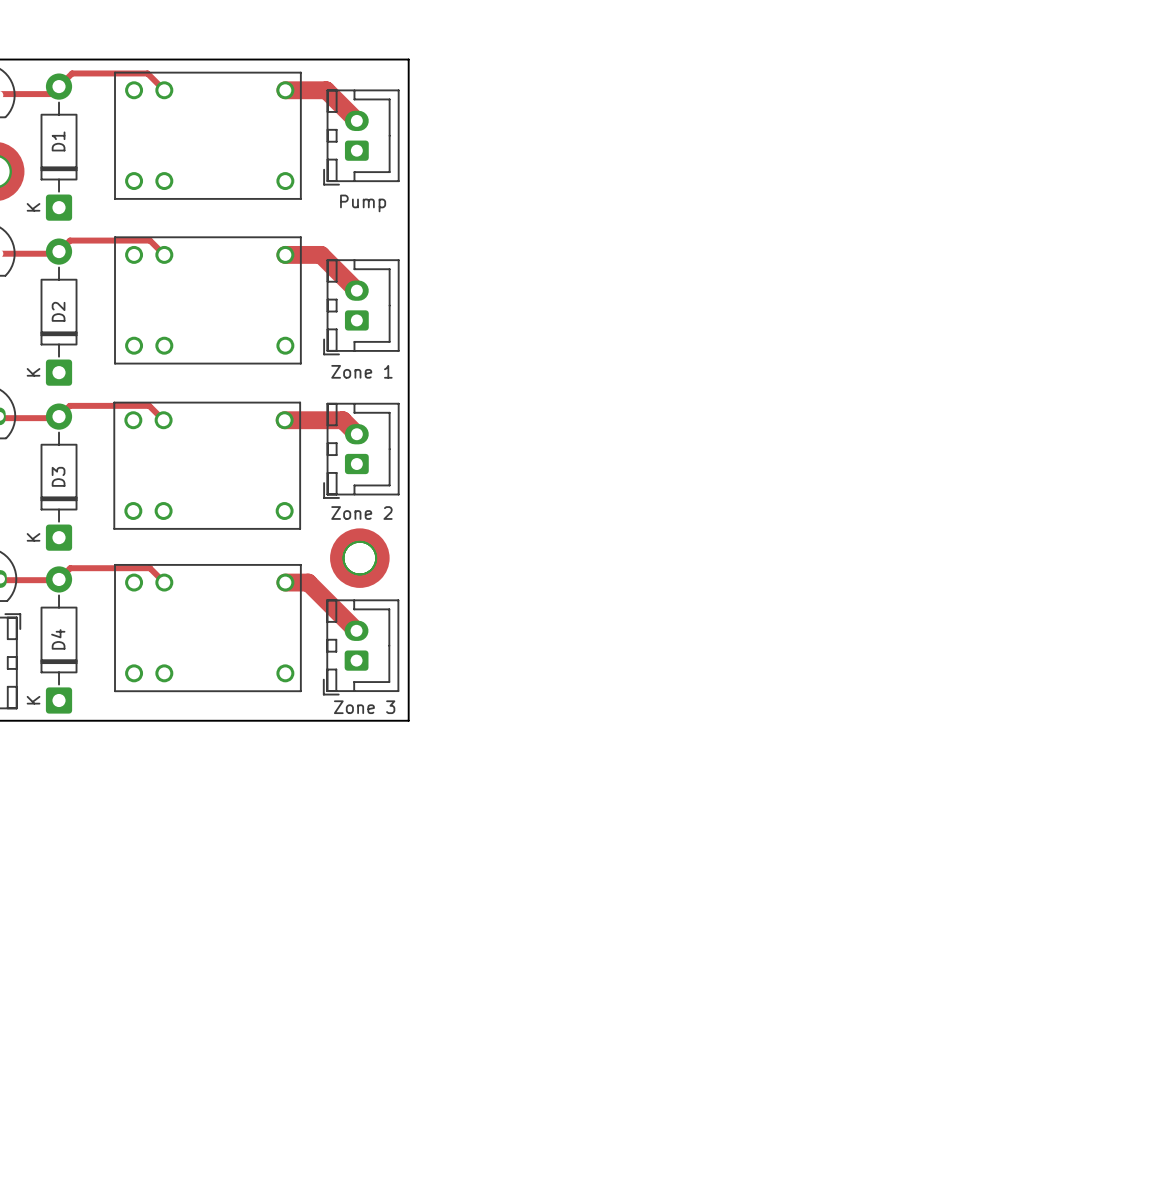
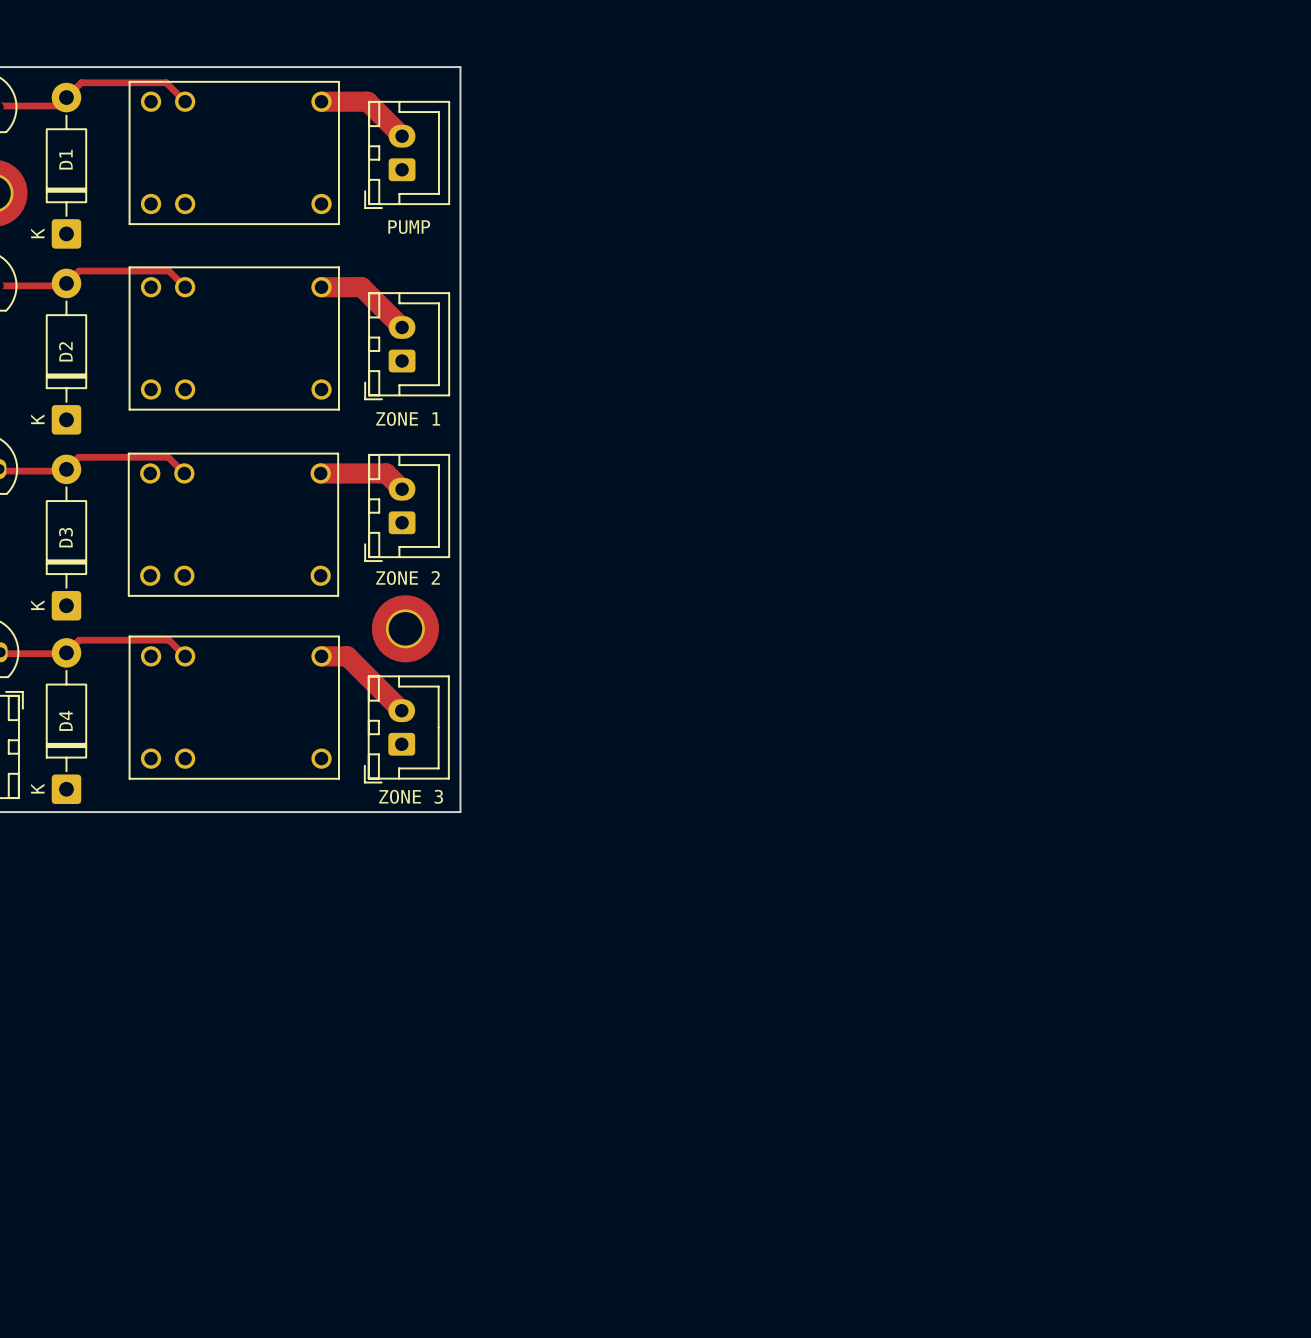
part value: Pump (363, 203) -> PUMP (409, 227)
part value: Zone 1 (361, 371) -> ZONE 1 (408, 418)
part value: Zone 2 (361, 513) -> ZONE 2 (408, 578)
part: (359, 558) -> none
part value: Zone 3 (364, 707) -> ZONE 3 (411, 796)

